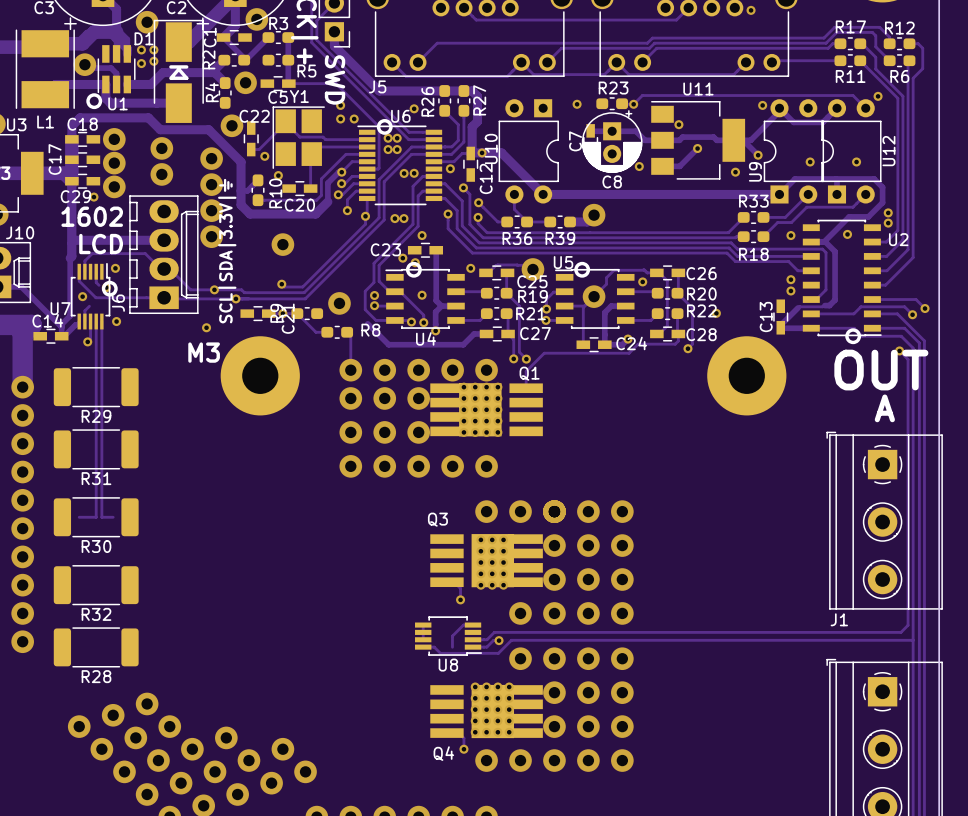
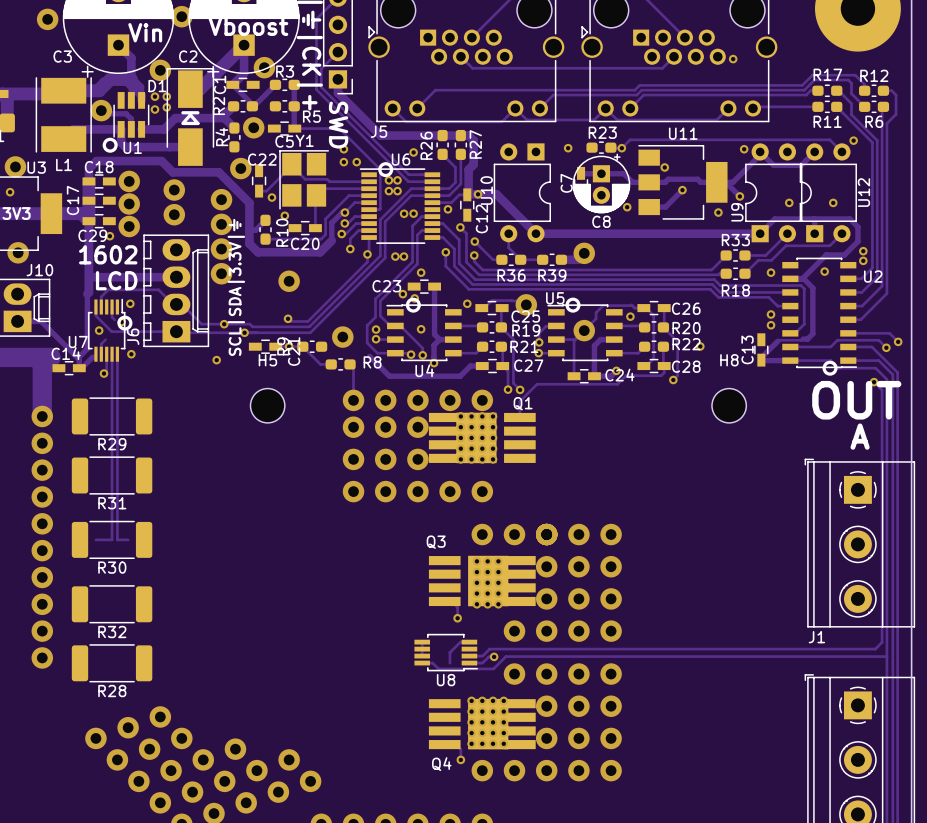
text: M3 (204, 352) -> none
part: (260, 375) -> none
H5: none -> (267, 405)
part: (746, 375) -> none
H8: none -> (729, 405)

